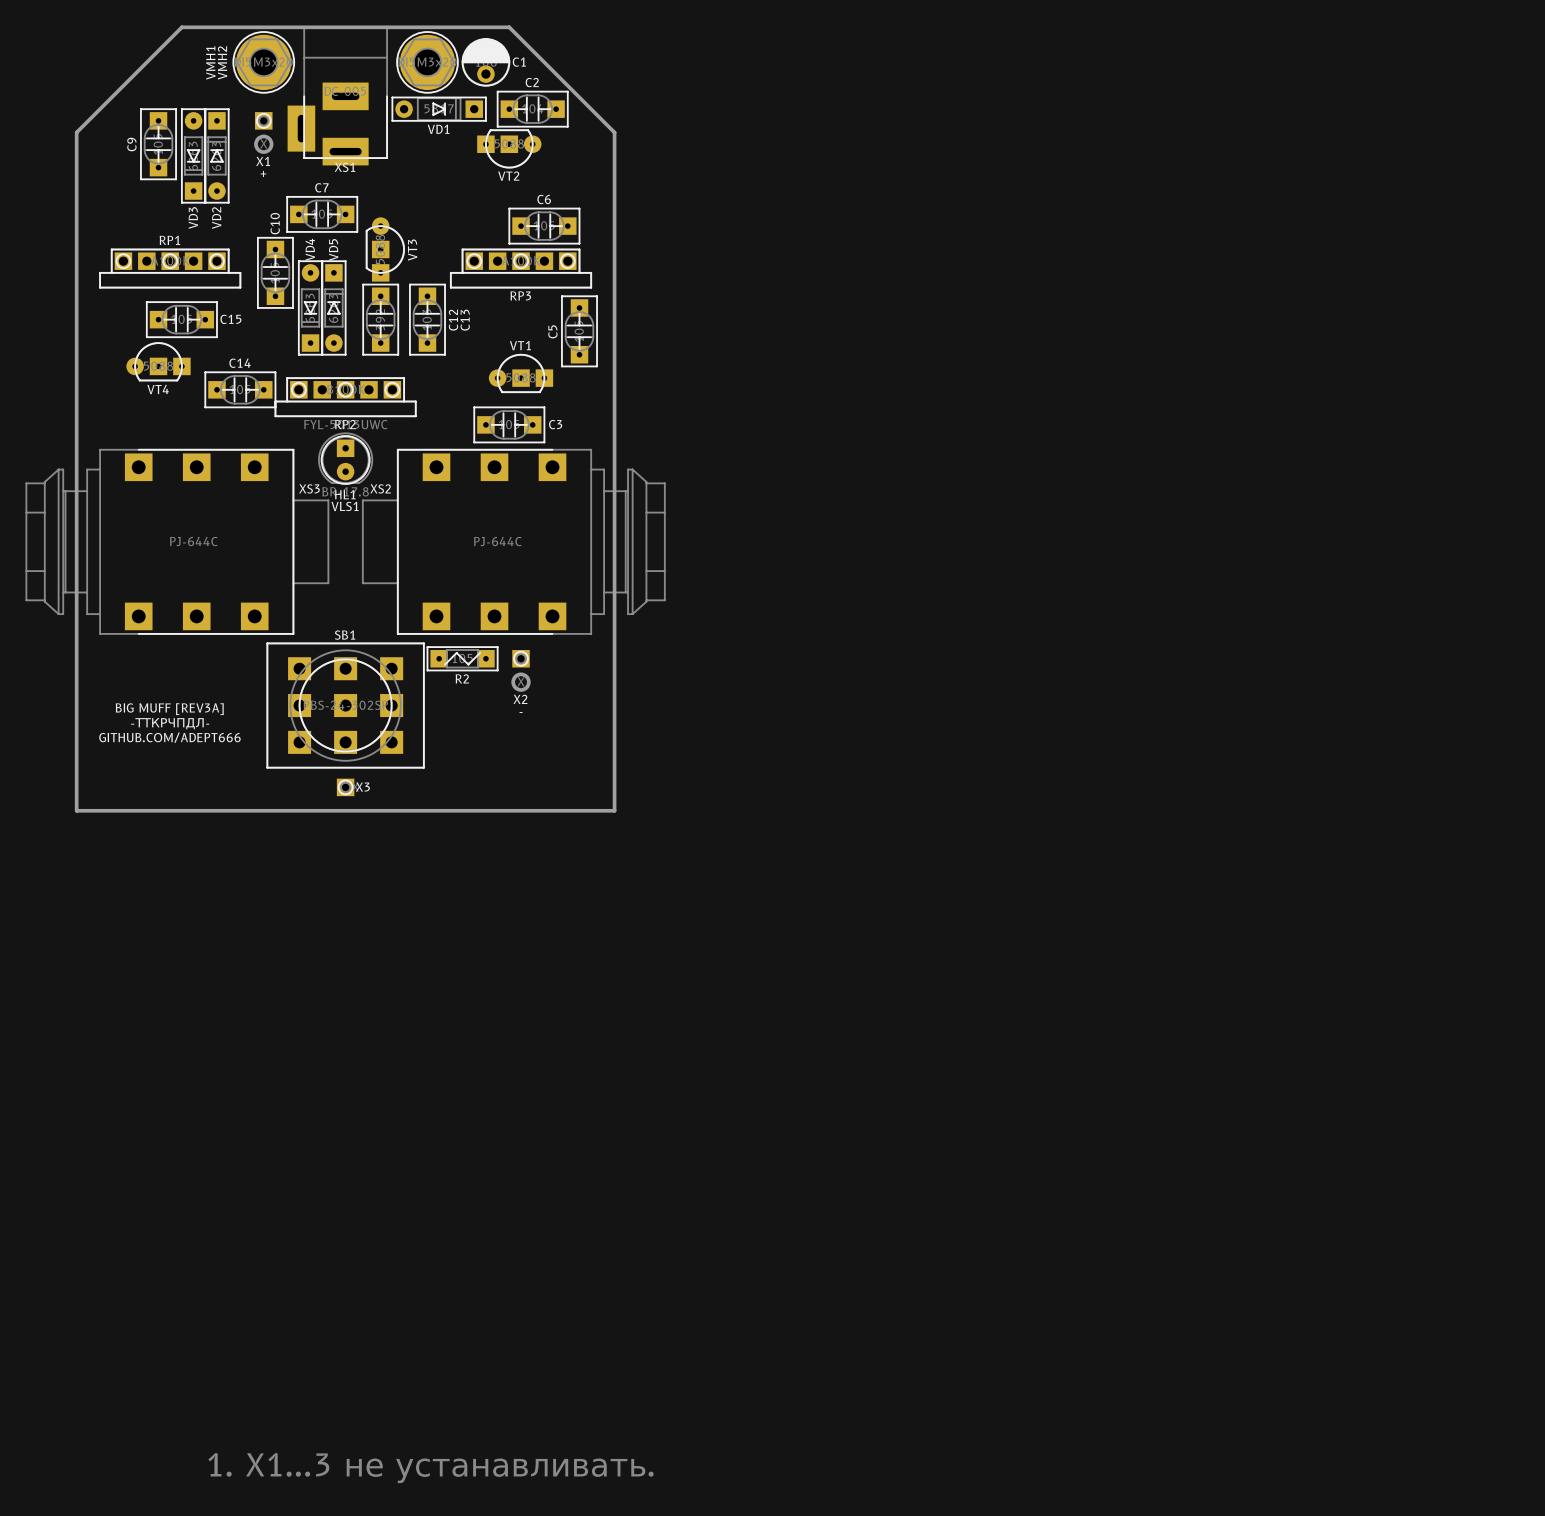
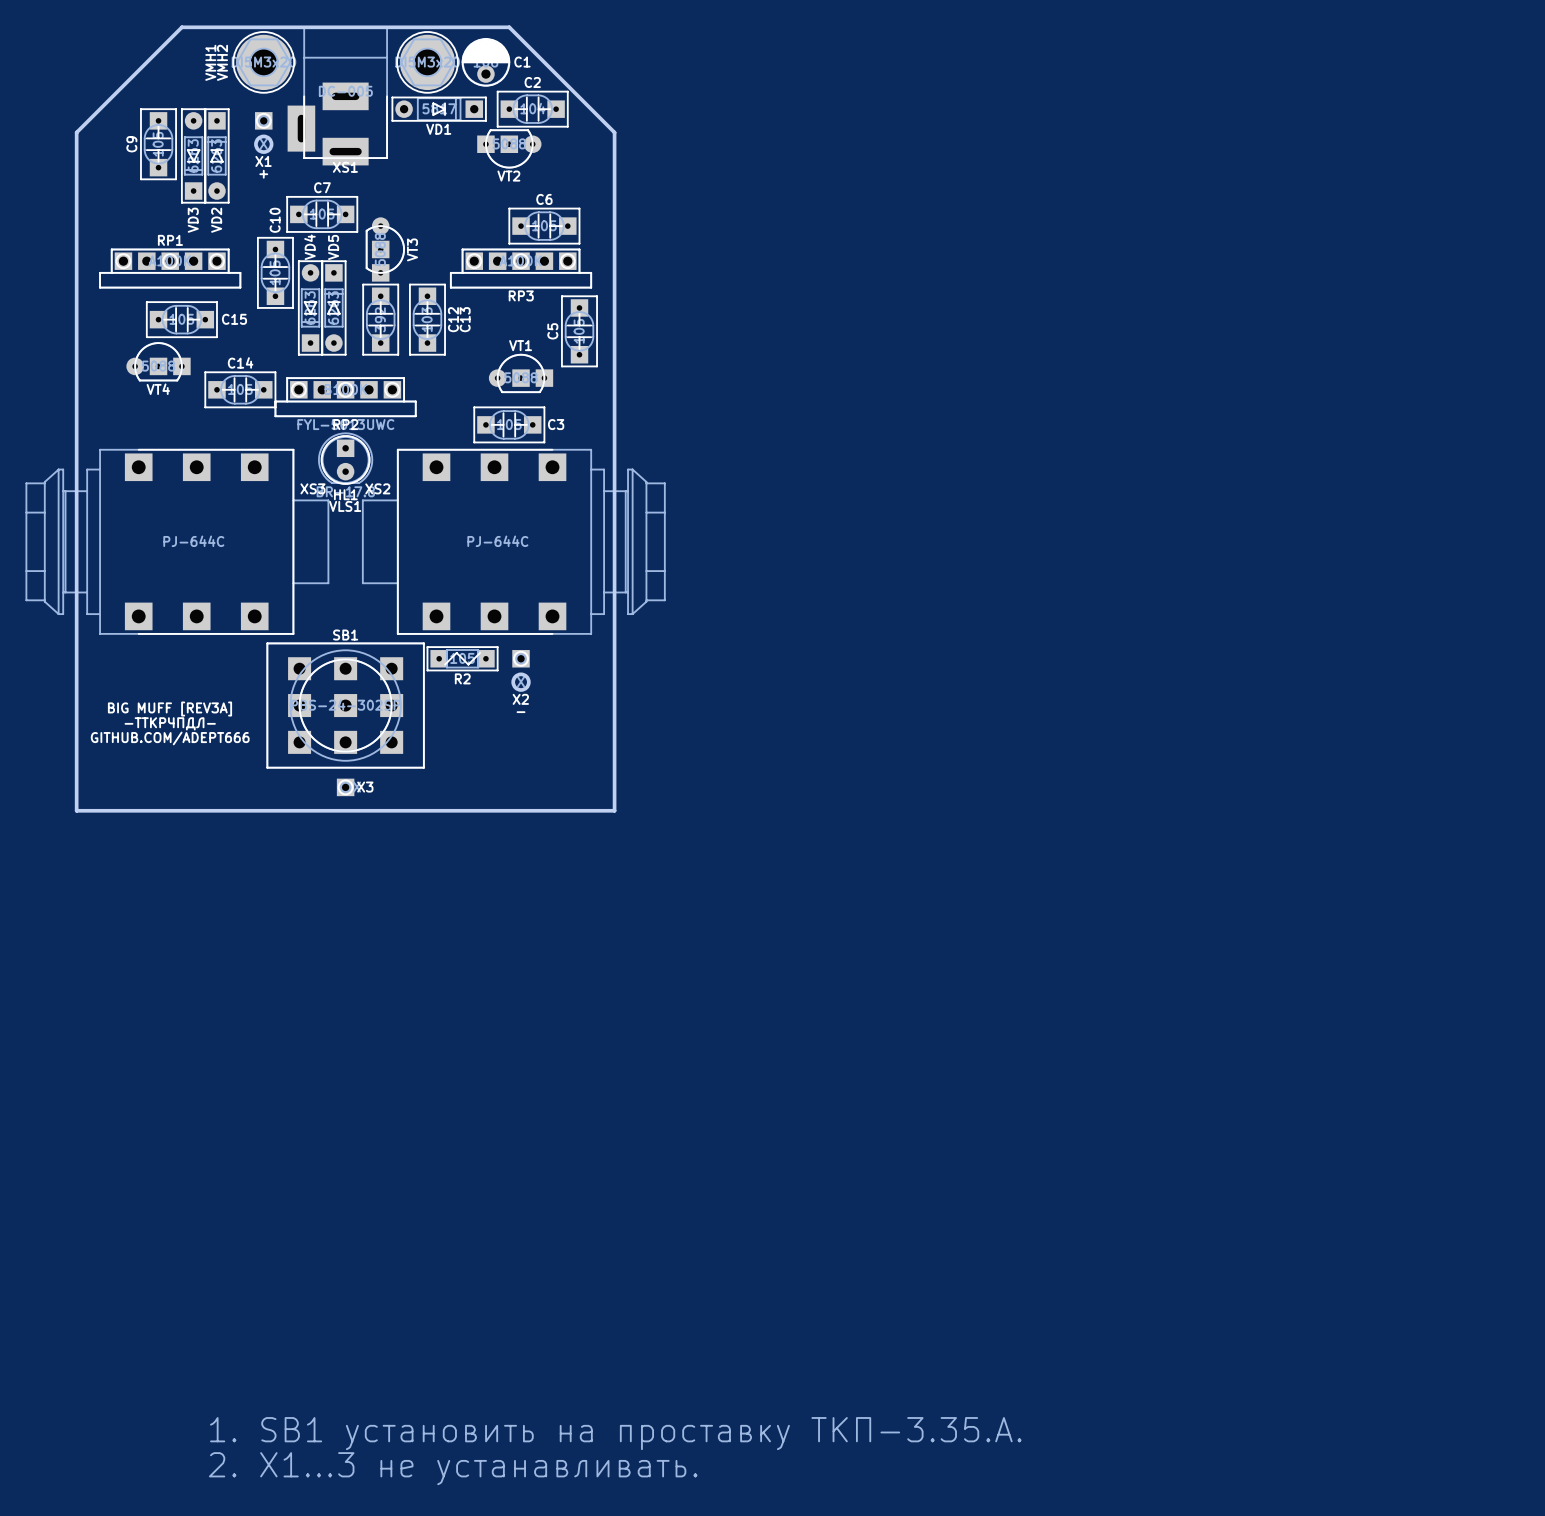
text: none -> 1. SB1 установить на проставку ТКП-3.35.A. (615, 1433)
text: 1. X1...3 не устанавливать. (430, 1468) -> 2. X1...3 не устанавливать. (453, 1468)

